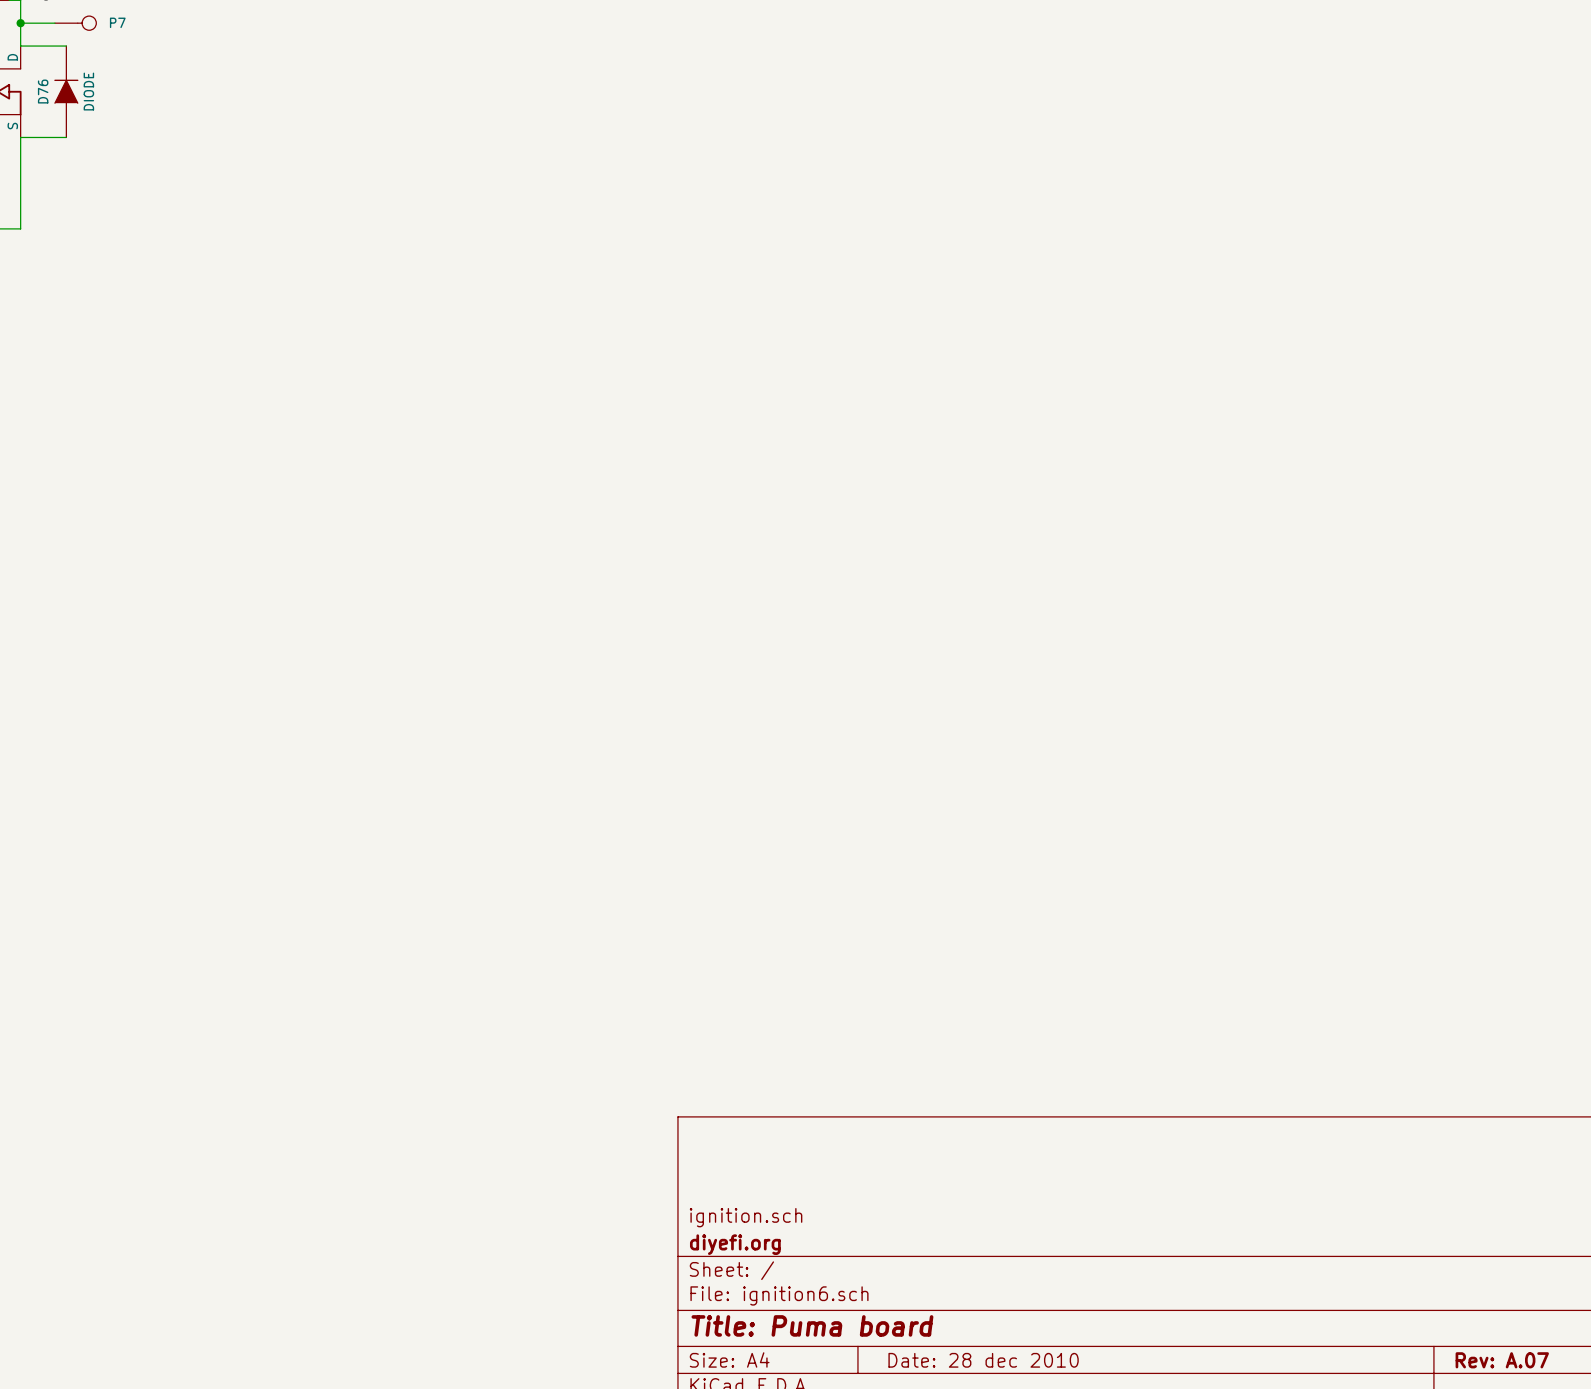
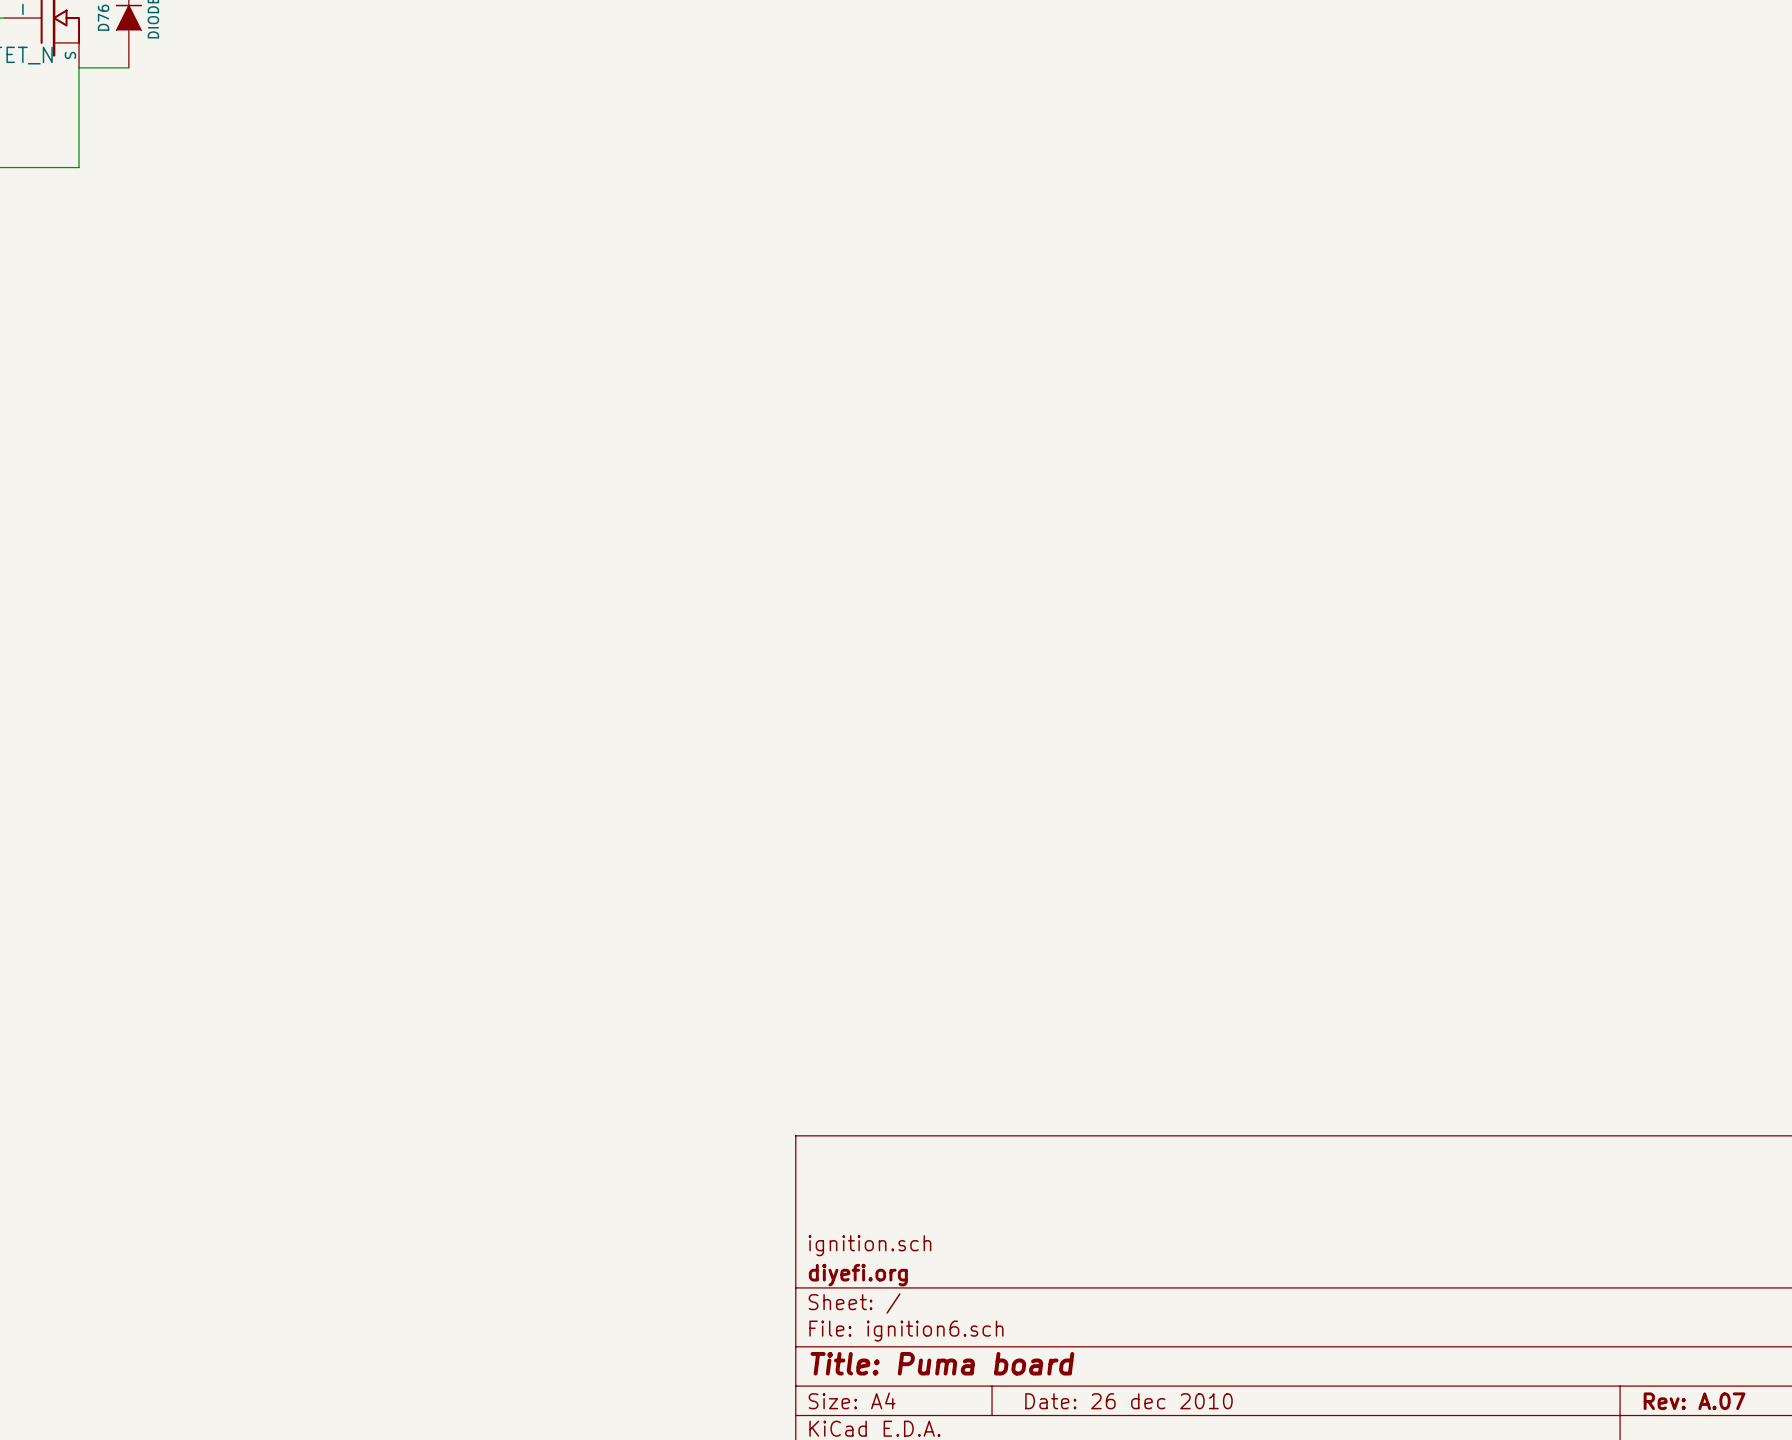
title block: Date: 28 dec 2010 (983, 1360) -> Date: 26 dec 2010 (1128, 1401)

